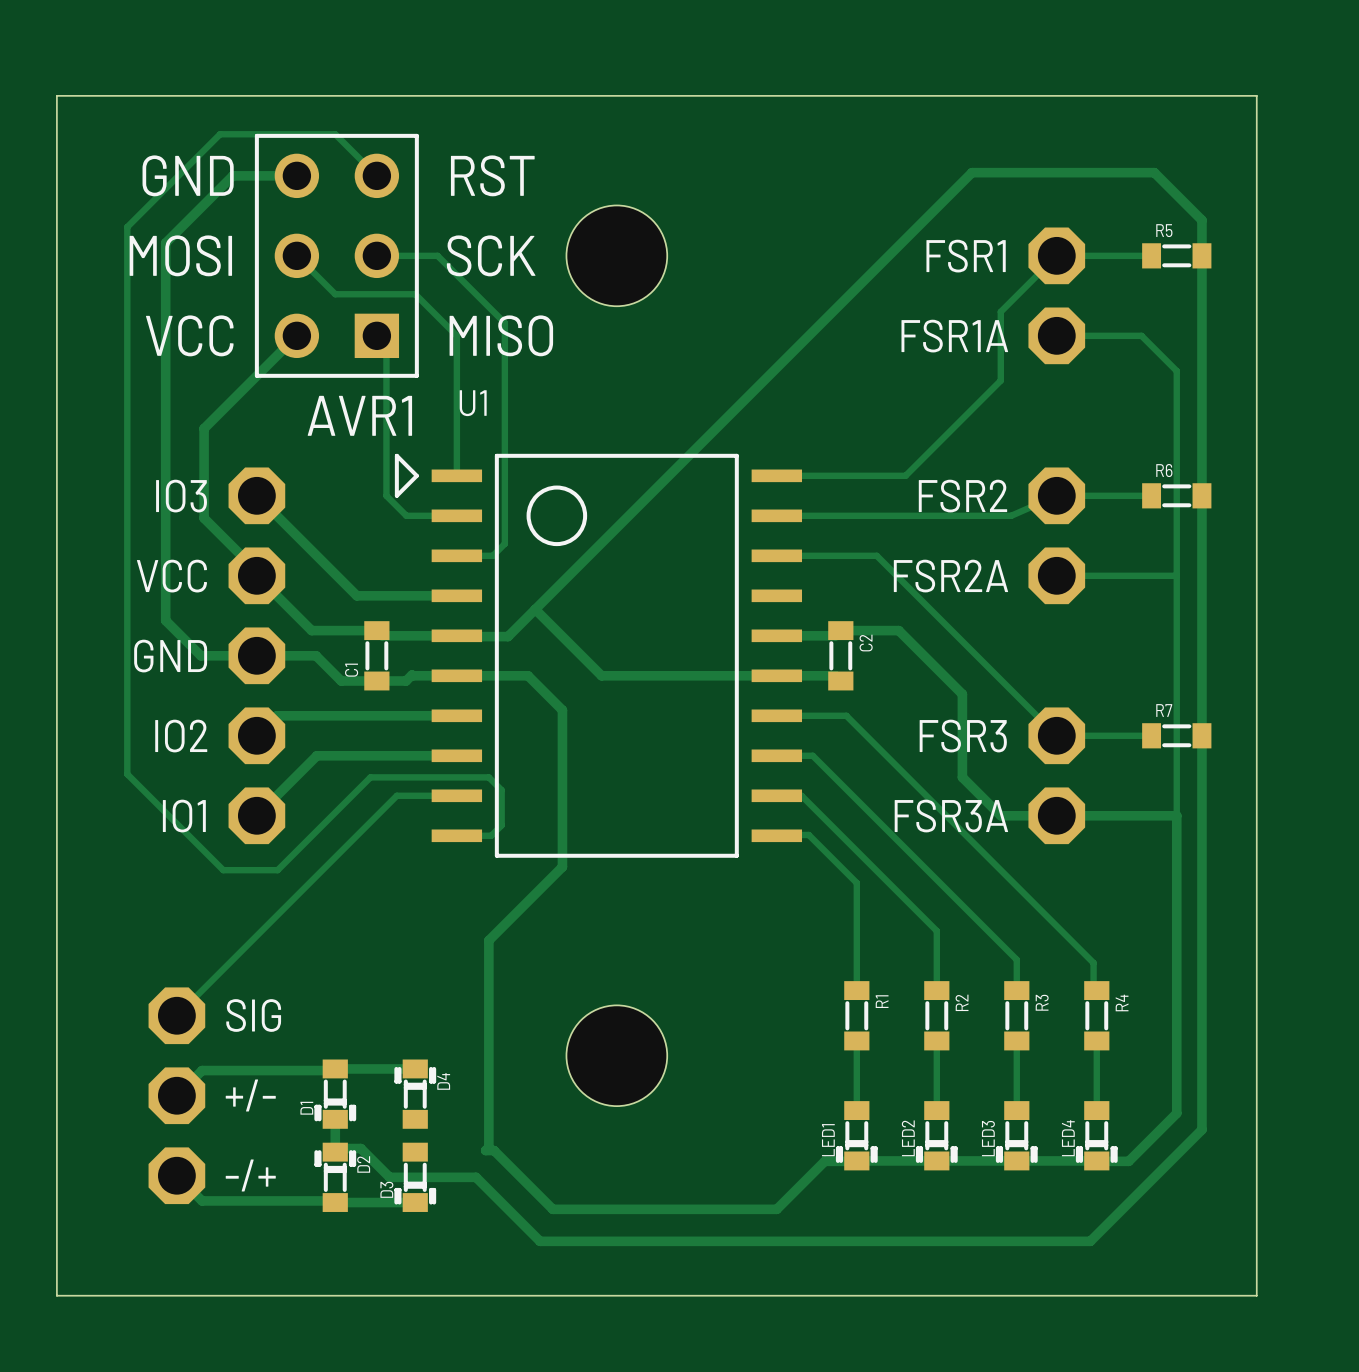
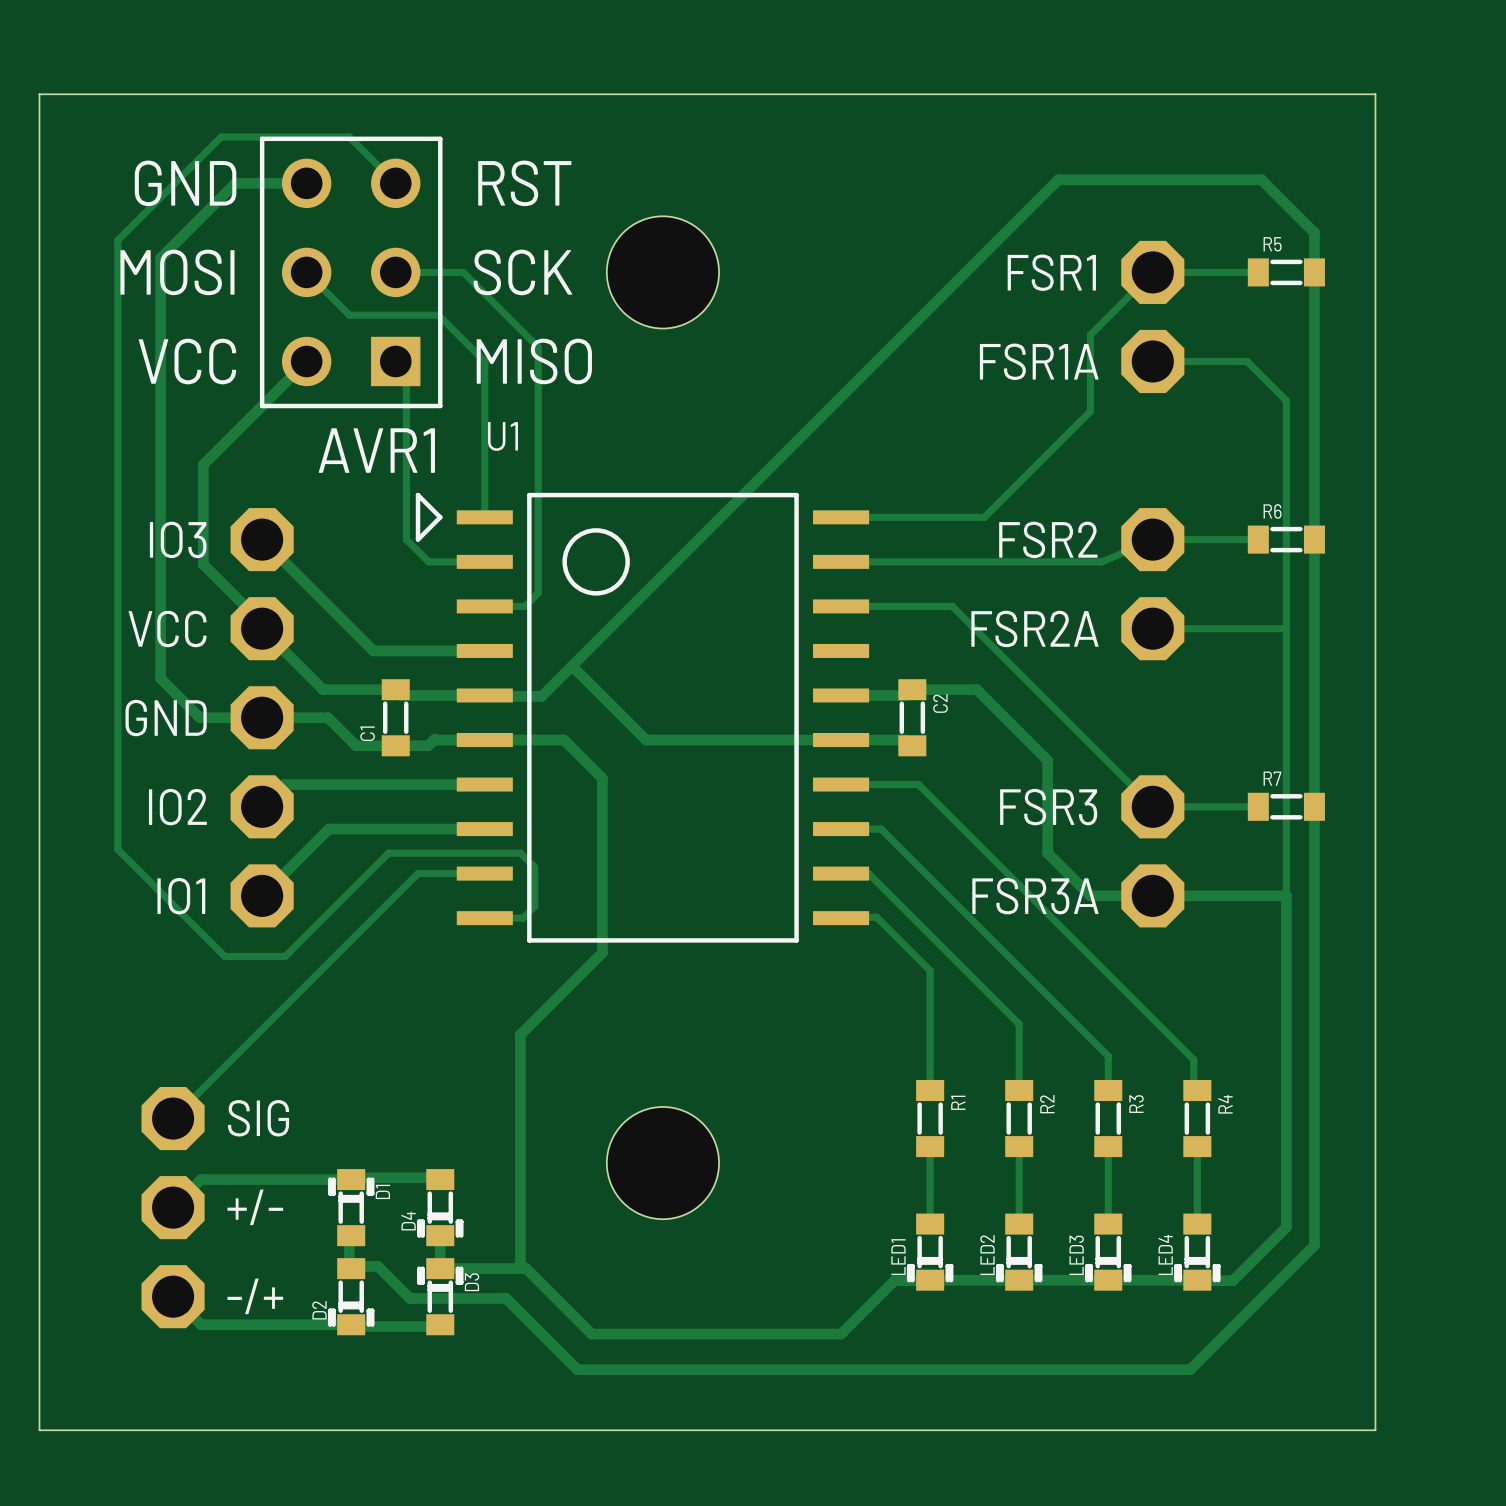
D1 rotation: 0° (335, 1094) -> 180° (351, 1207)
D4 rotation: 0° (415, 1094) -> 180° (440, 1207)
track: none -> (440, 1235) (440, 1268) (516, 1268)
D2 rotation: 0° (335, 1177) -> 180° (351, 1296)
D3 rotation: 0° (415, 1177) -> 180° (440, 1296)

